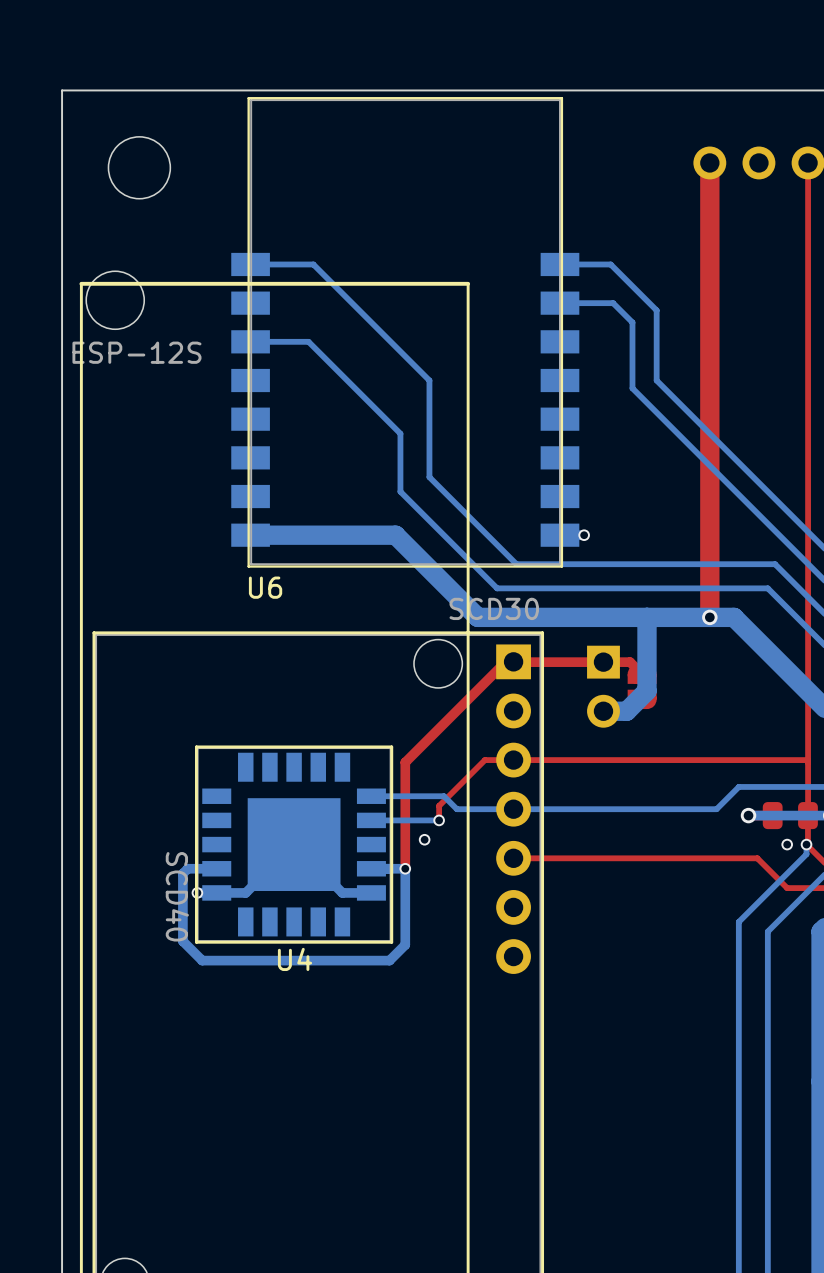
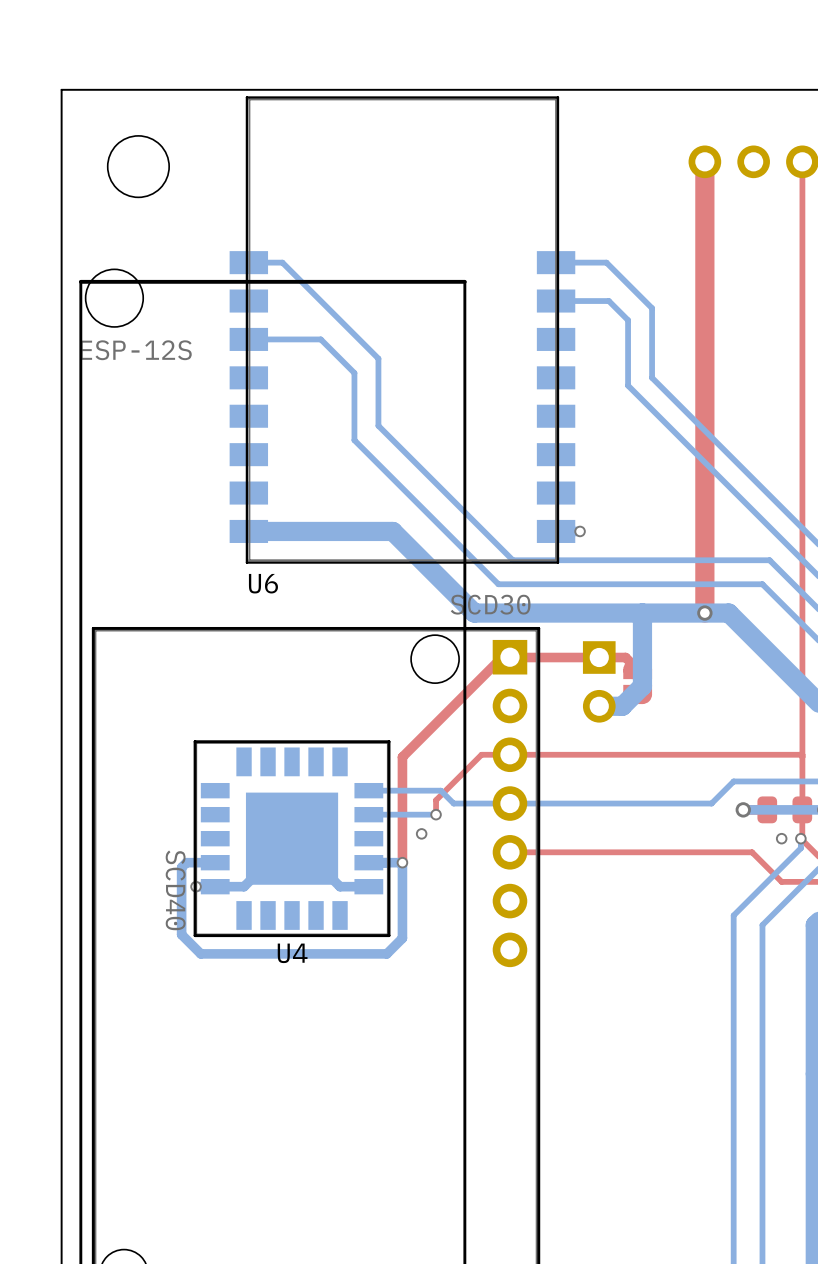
bottom track: (284, 264) (313, 264) (429, 380) (429, 477) -> (282, 262) (378, 358) (378, 425) (426, 473)
bottom track: (308, 341) (400, 433) (400, 491) (497, 588) (501, 588) -> (306, 339) (320, 339) (354, 373) (354, 440) (498, 584)

